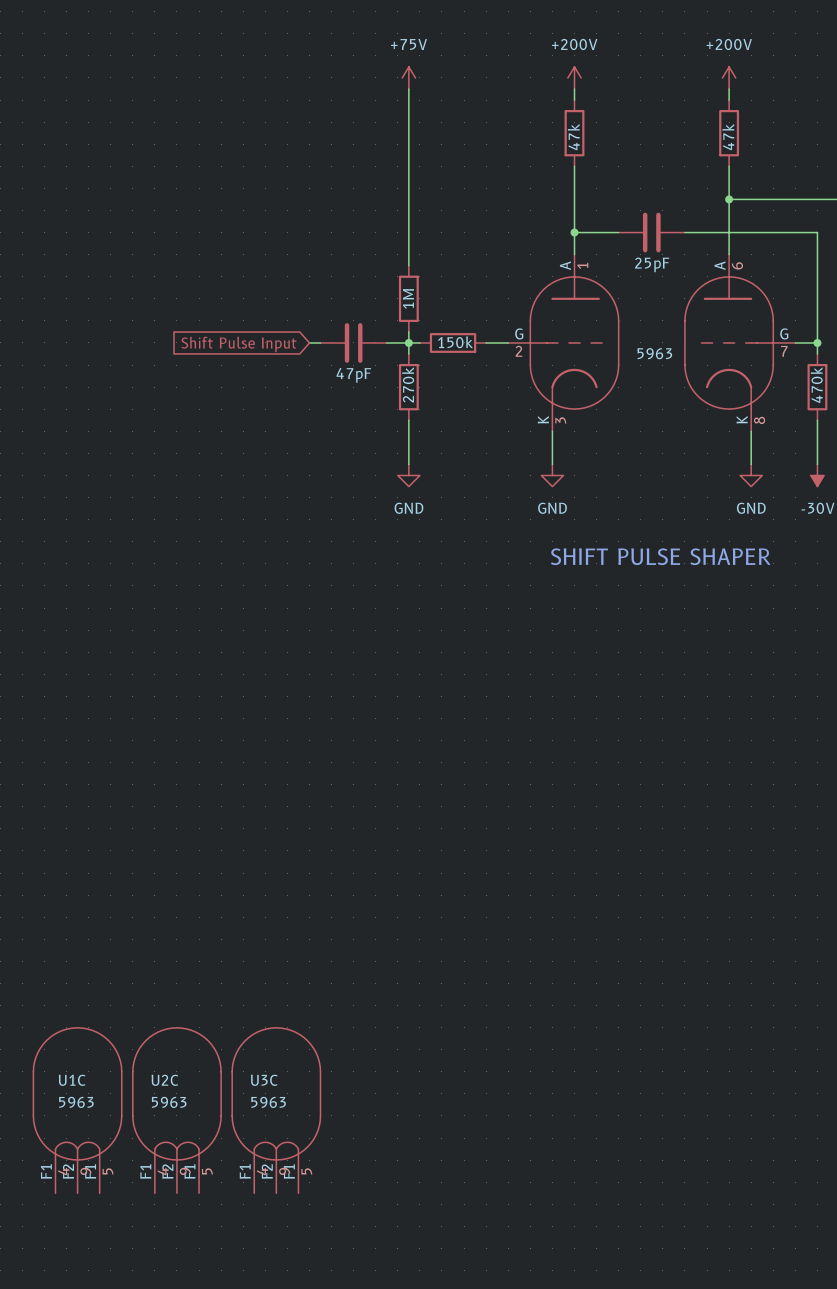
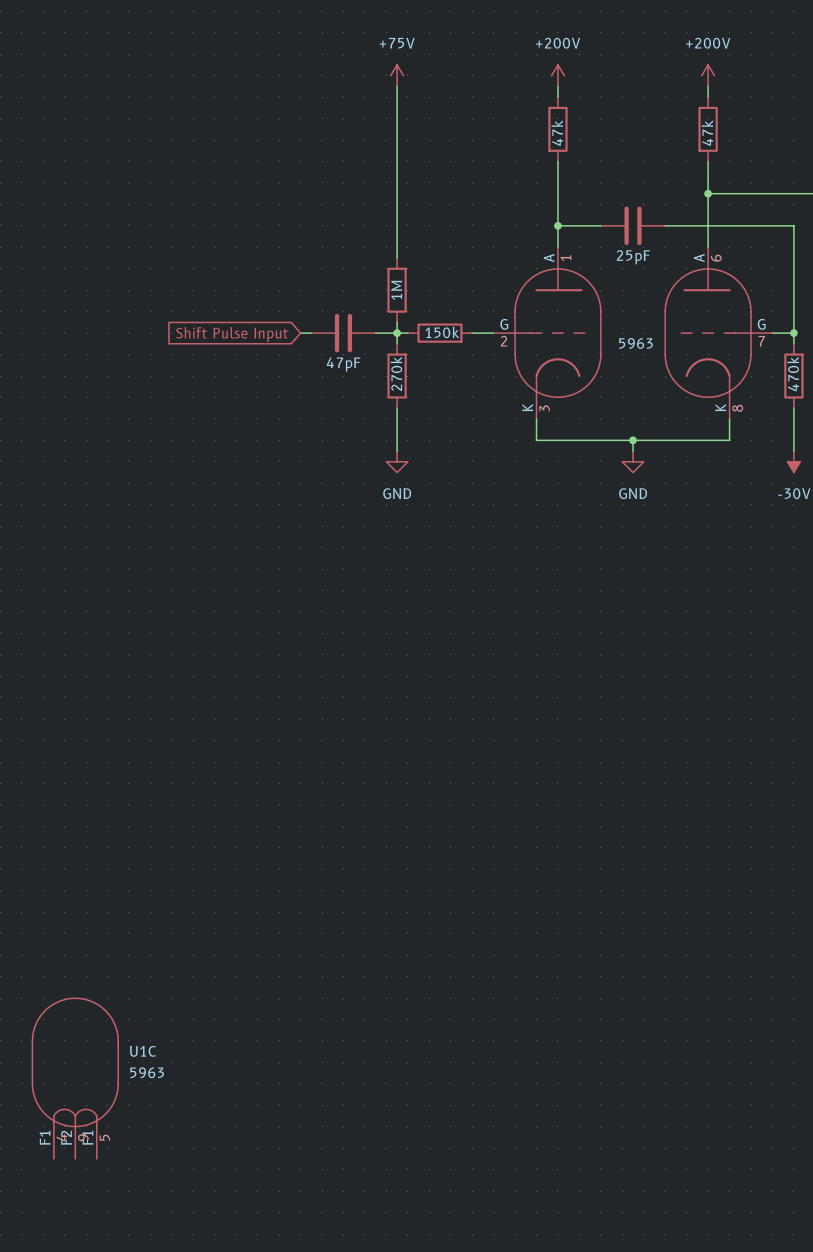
wire: (552, 453) (552, 464) -> (536, 440) (729, 440)
junction: none -> (633, 440)
wire: (751, 453) (751, 464) -> (633, 440) (633, 451)
power symbol: GND (552, 475) -> none
power symbol: none -> GND (633, 461)
power symbol: GND (751, 475) -> none
text: SHIFT PULSE SHAPER (660, 556) -> none
U1C name position: U1C (72, 1080) -> U1C (142, 1051)
U1C value position: 5963 (76, 1102) -> 5963 (147, 1072)
U2C: 5963 (176, 1110) -> none
U3C: 5963 (276, 1110) -> none

